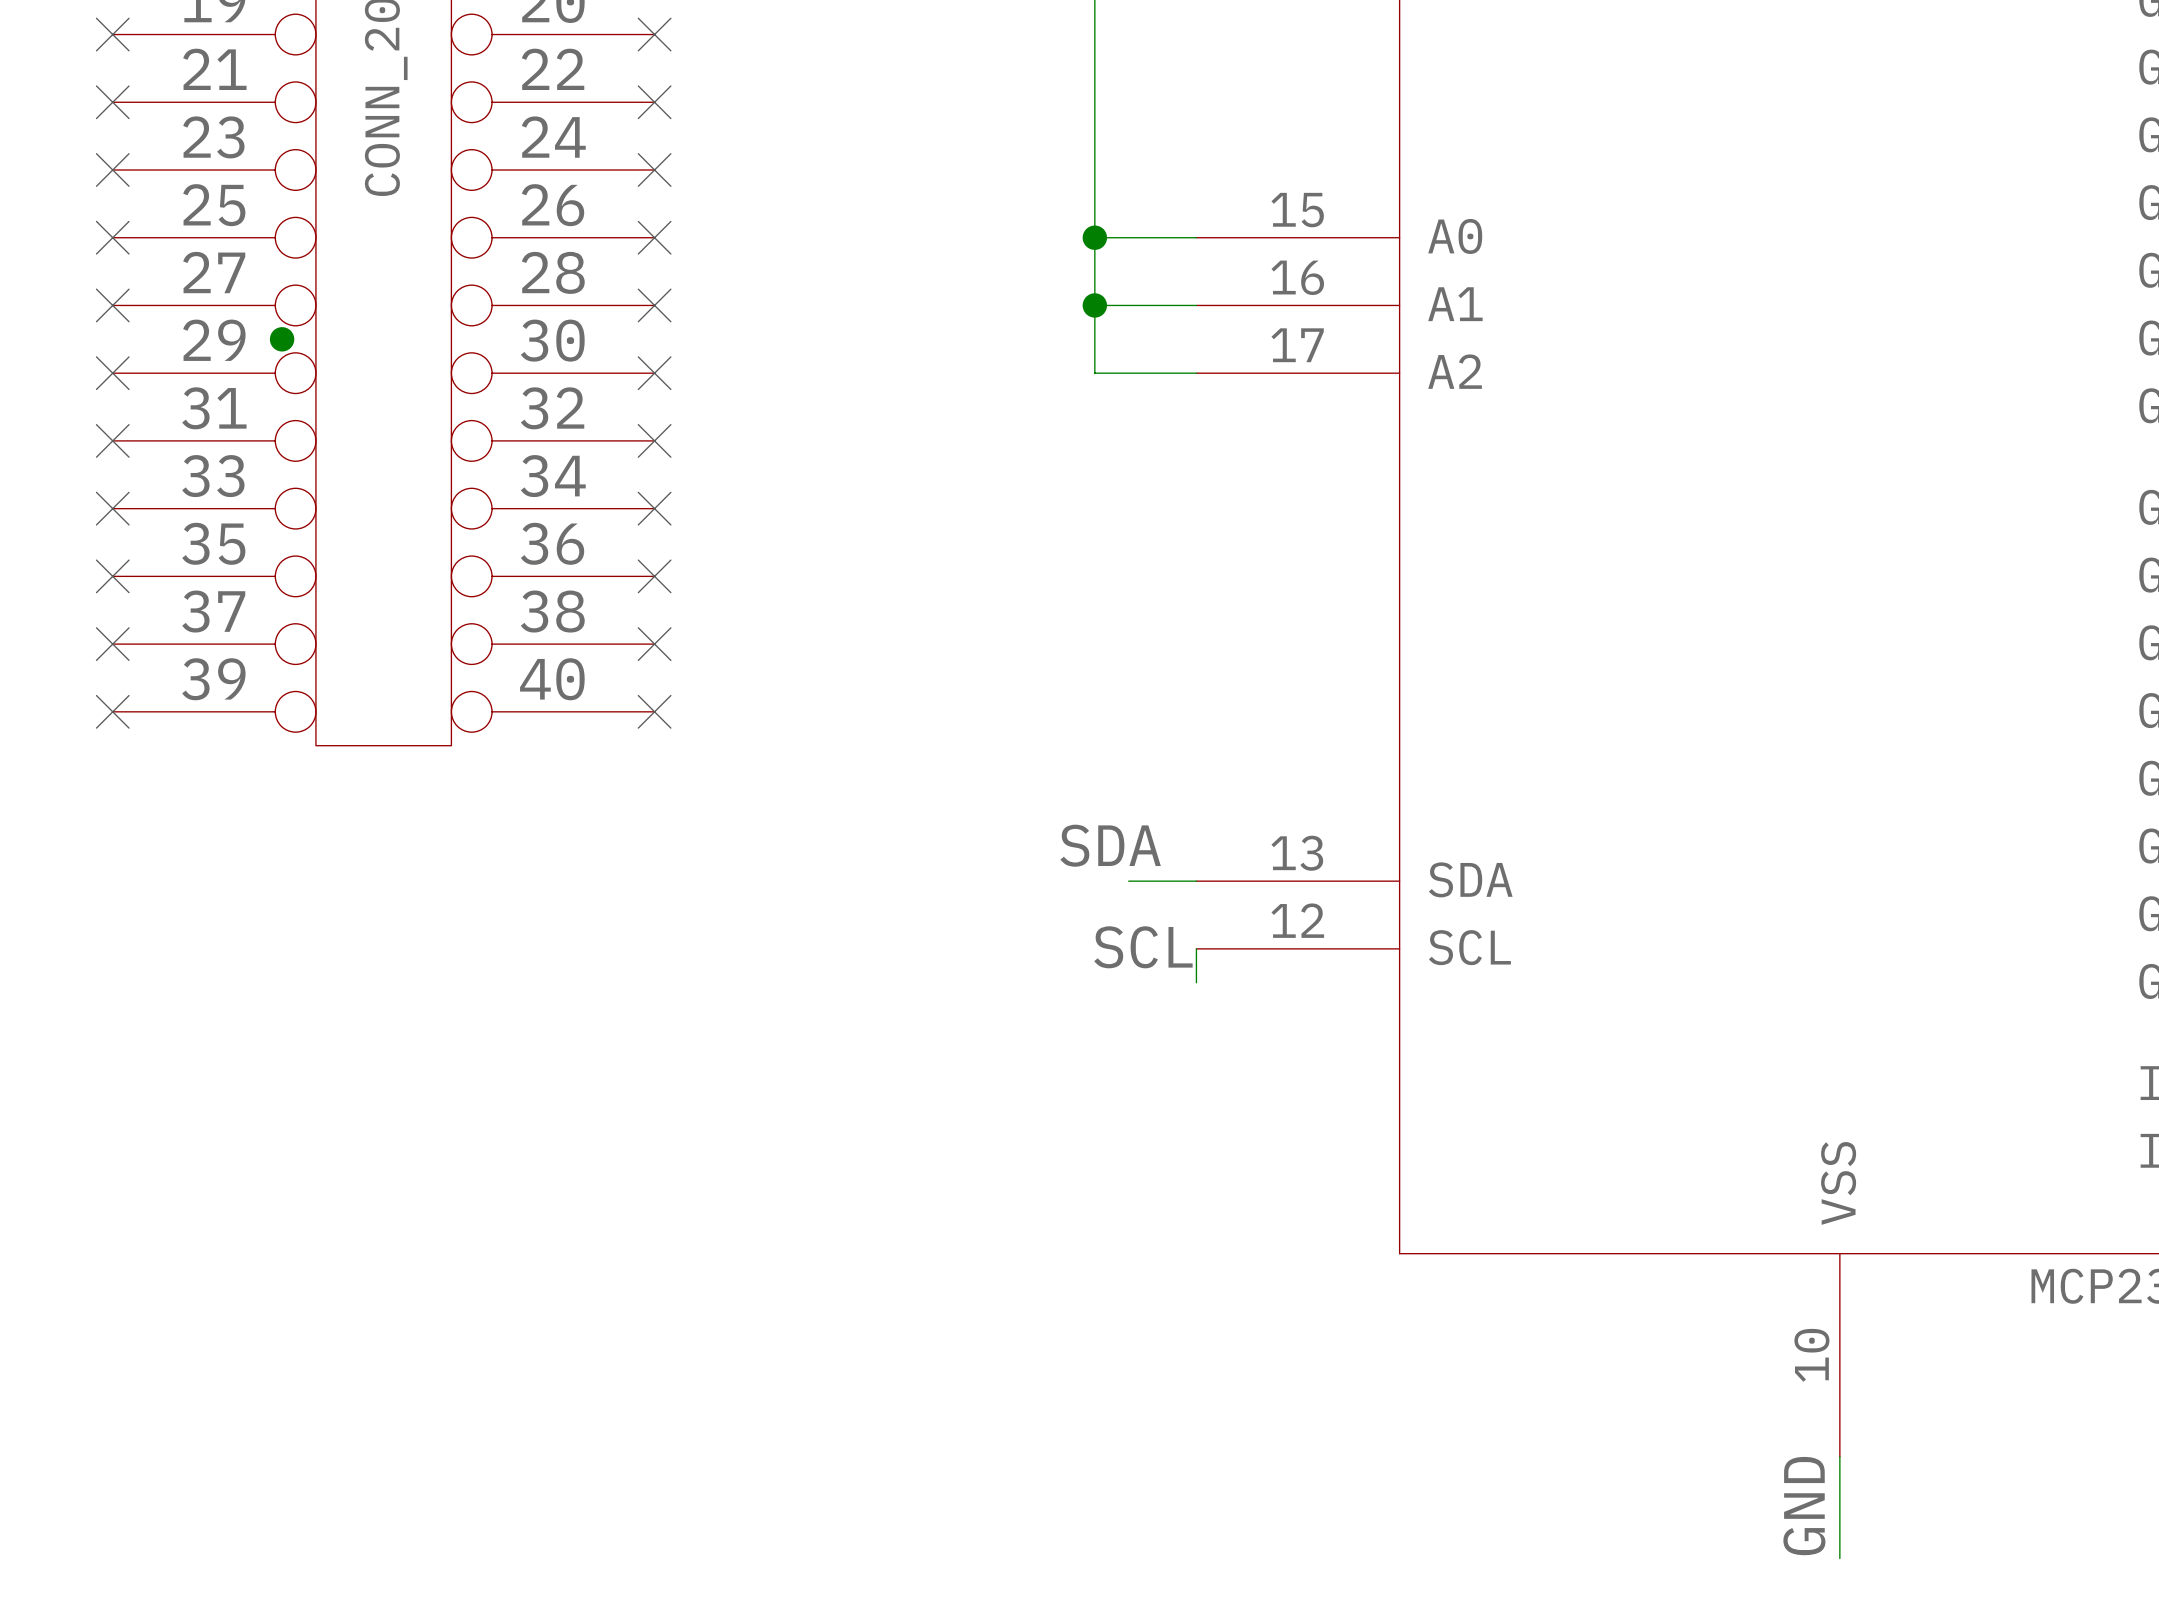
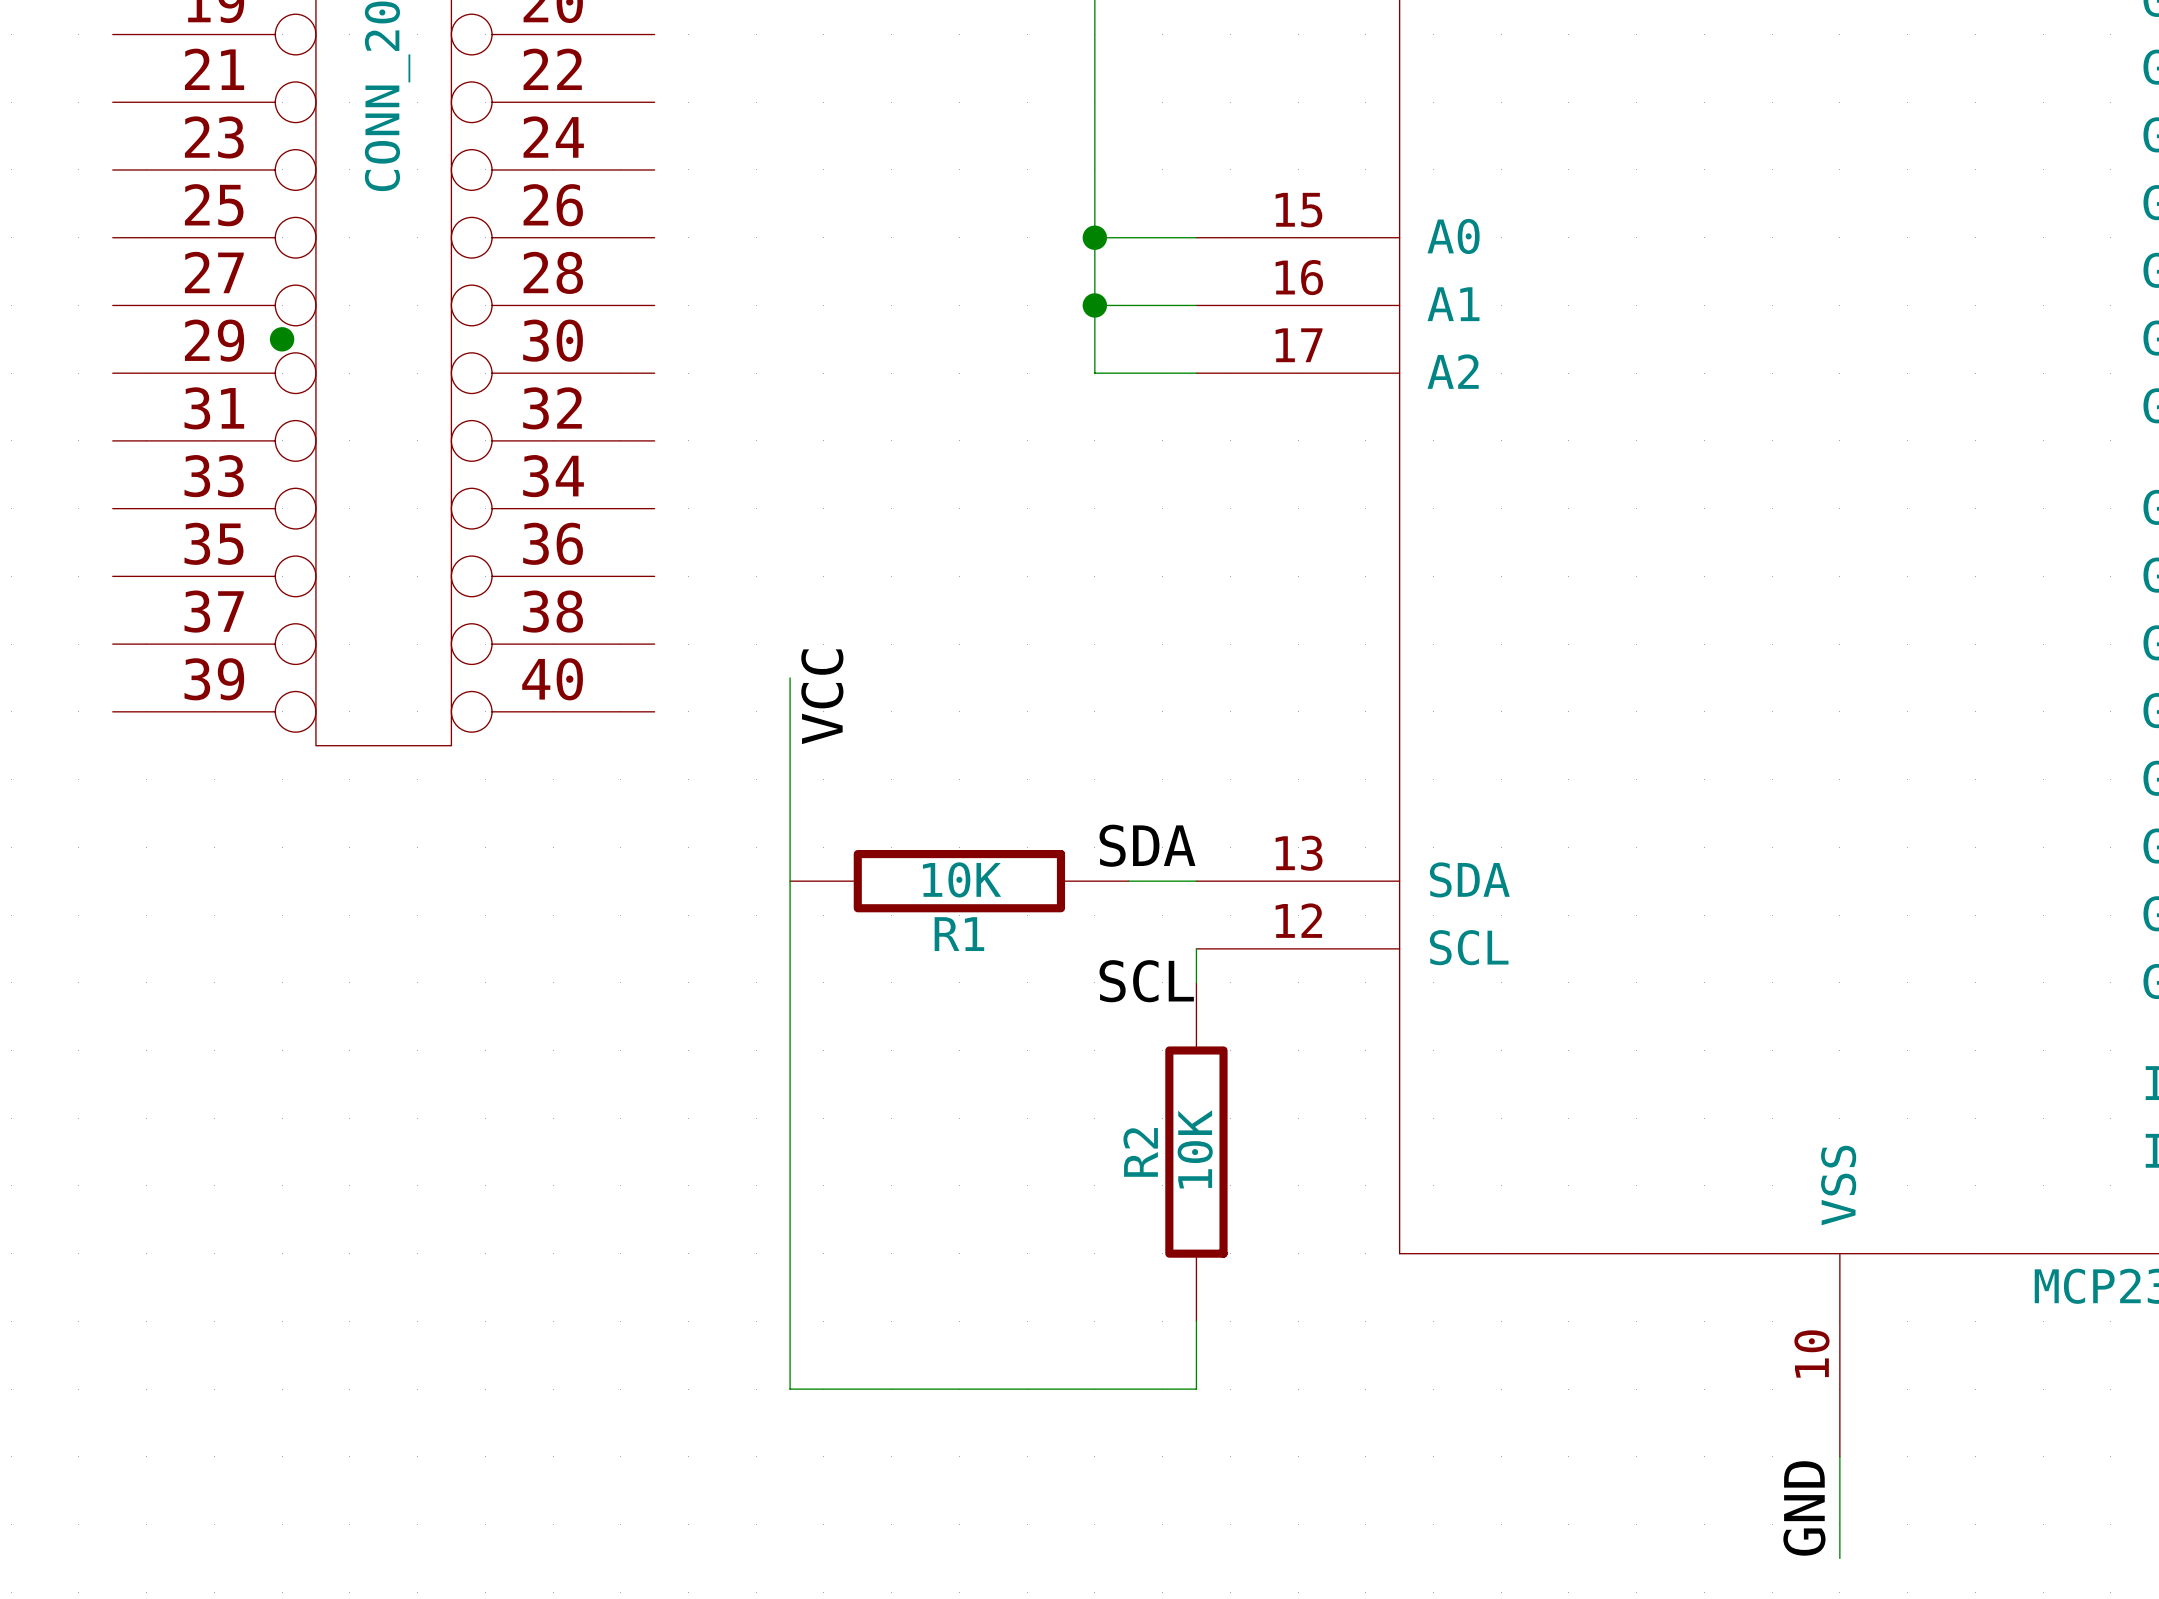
no-connect mark: (112, 34) -> none
no-connect mark: (654, 34) -> none
no-connect mark: (112, 102) -> none
no-connect mark: (654, 102) -> none
no-connect mark: (112, 169) -> none
no-connect mark: (654, 169) -> none
no-connect mark: (112, 237) -> none
no-connect mark: (654, 237) -> none
no-connect mark: (112, 305) -> none
no-connect mark: (654, 305) -> none
no-connect mark: (112, 373) -> none
no-connect mark: (654, 373) -> none
no-connect mark: (112, 440) -> none
no-connect mark: (654, 440) -> none
no-connect mark: (112, 508) -> none
no-connect mark: (654, 508) -> none
no-connect mark: (112, 576) -> none
no-connect mark: (654, 576) -> none
no-connect mark: (112, 644) -> none
no-connect mark: (654, 644) -> none
wire: none -> (790, 677) (790, 1389) (1196, 1389) (1196, 1321)
label: none -> VCC (822, 696)
no-connect mark: (112, 711) -> none
no-connect mark: (654, 711) -> none
label position: SDA (1110, 845) -> SDA (1147, 845)
R1: none -> 10K (959, 881)
label position: SCL (1143, 947) -> SCL (1146, 981)
R2: none -> 10K (1196, 1152)

